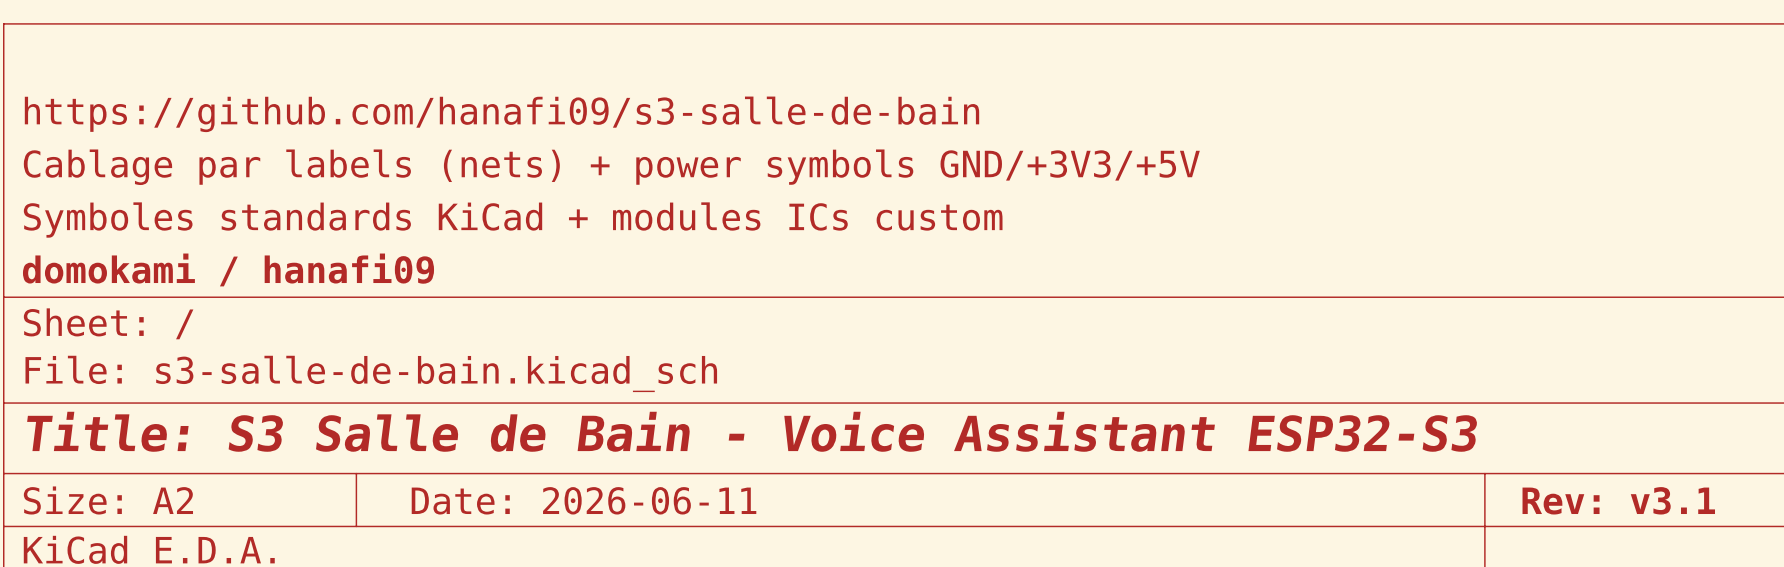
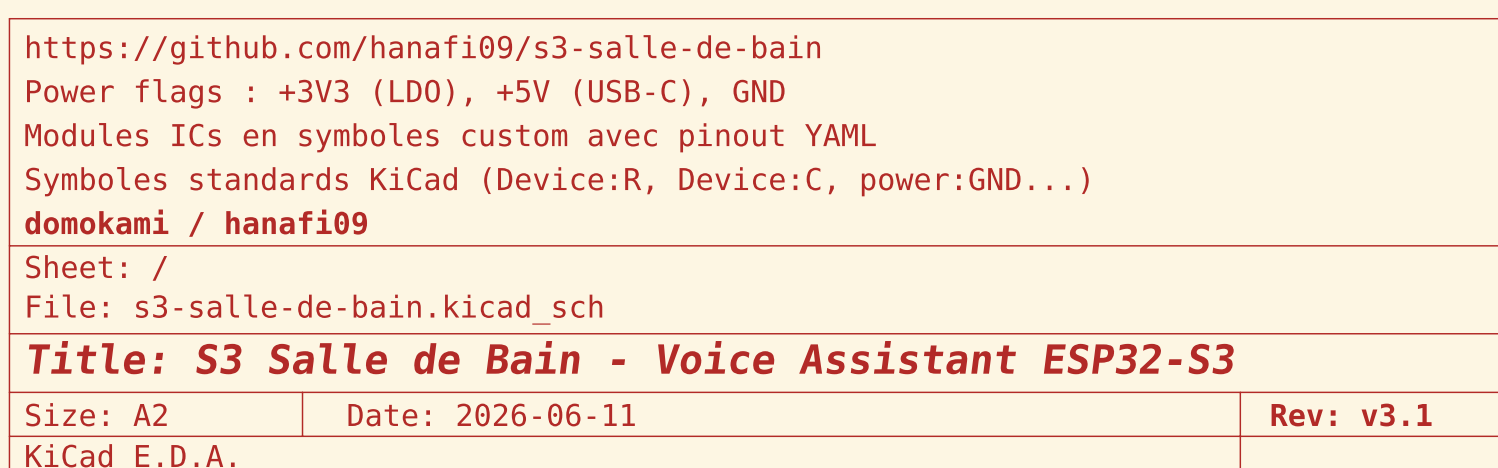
title block: none -> https://github.com/hanafi09/s3-salle-de-bain (423, 49)
title block: https://github.com/hanafi09/s3-salle-de-bain (501, 114) -> Power flags : +3V3 (LDO), +5V (USB-C), GND (405, 93)
title block: Cablage par labels (nets) + power symbols GND/+3V3/+5V (611, 167) -> Modules ICs en symboles custom avec pinout YAML (450, 137)
title block: Symboles standards KiCad + modules ICs custom (513, 220) -> Symboles standards KiCad (Device:R, Device:C, power:GND...) (557, 181)

